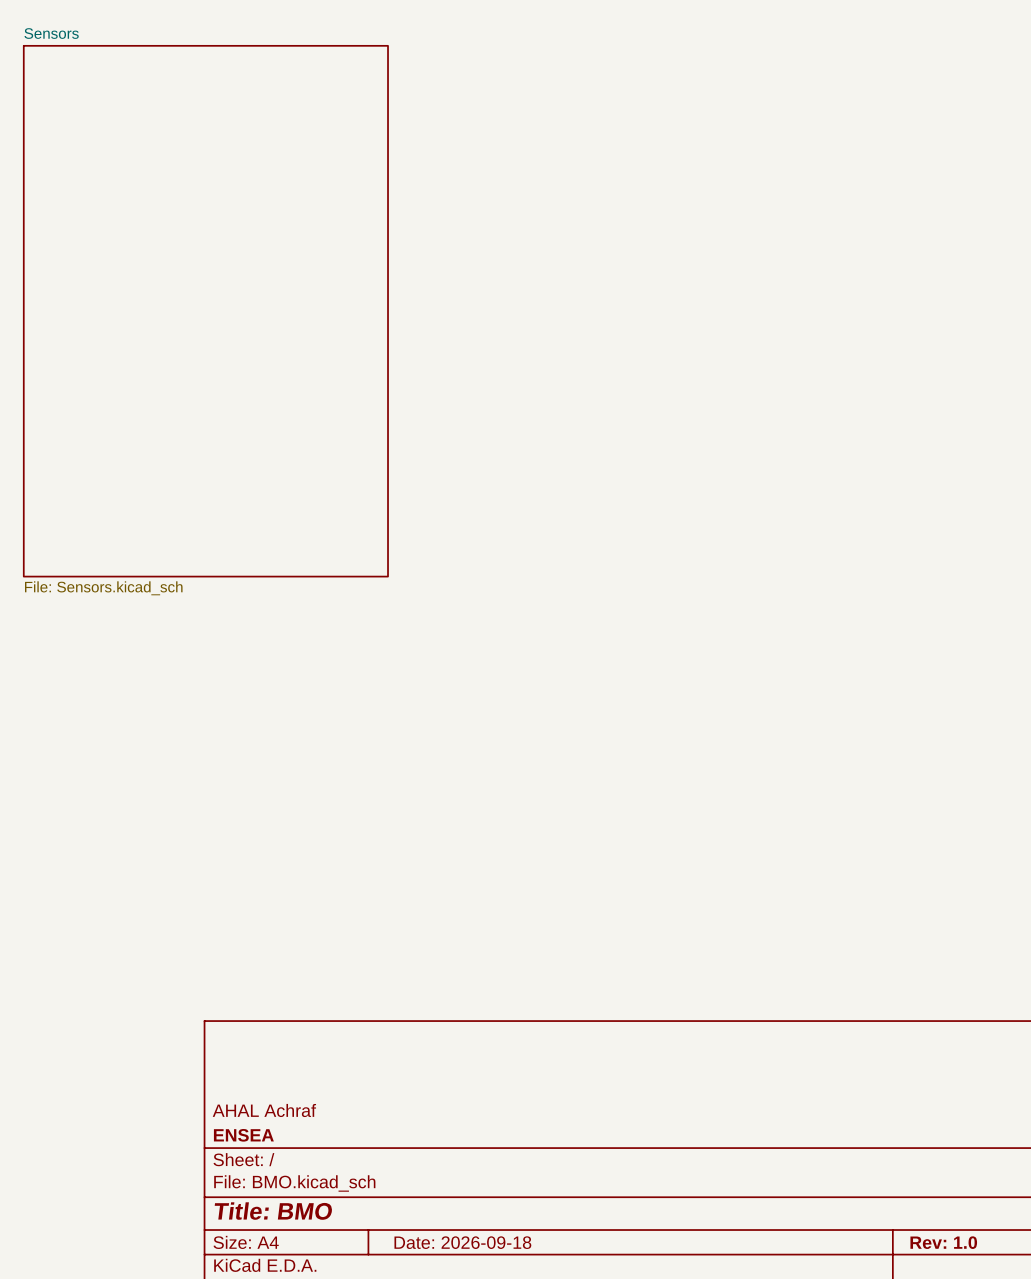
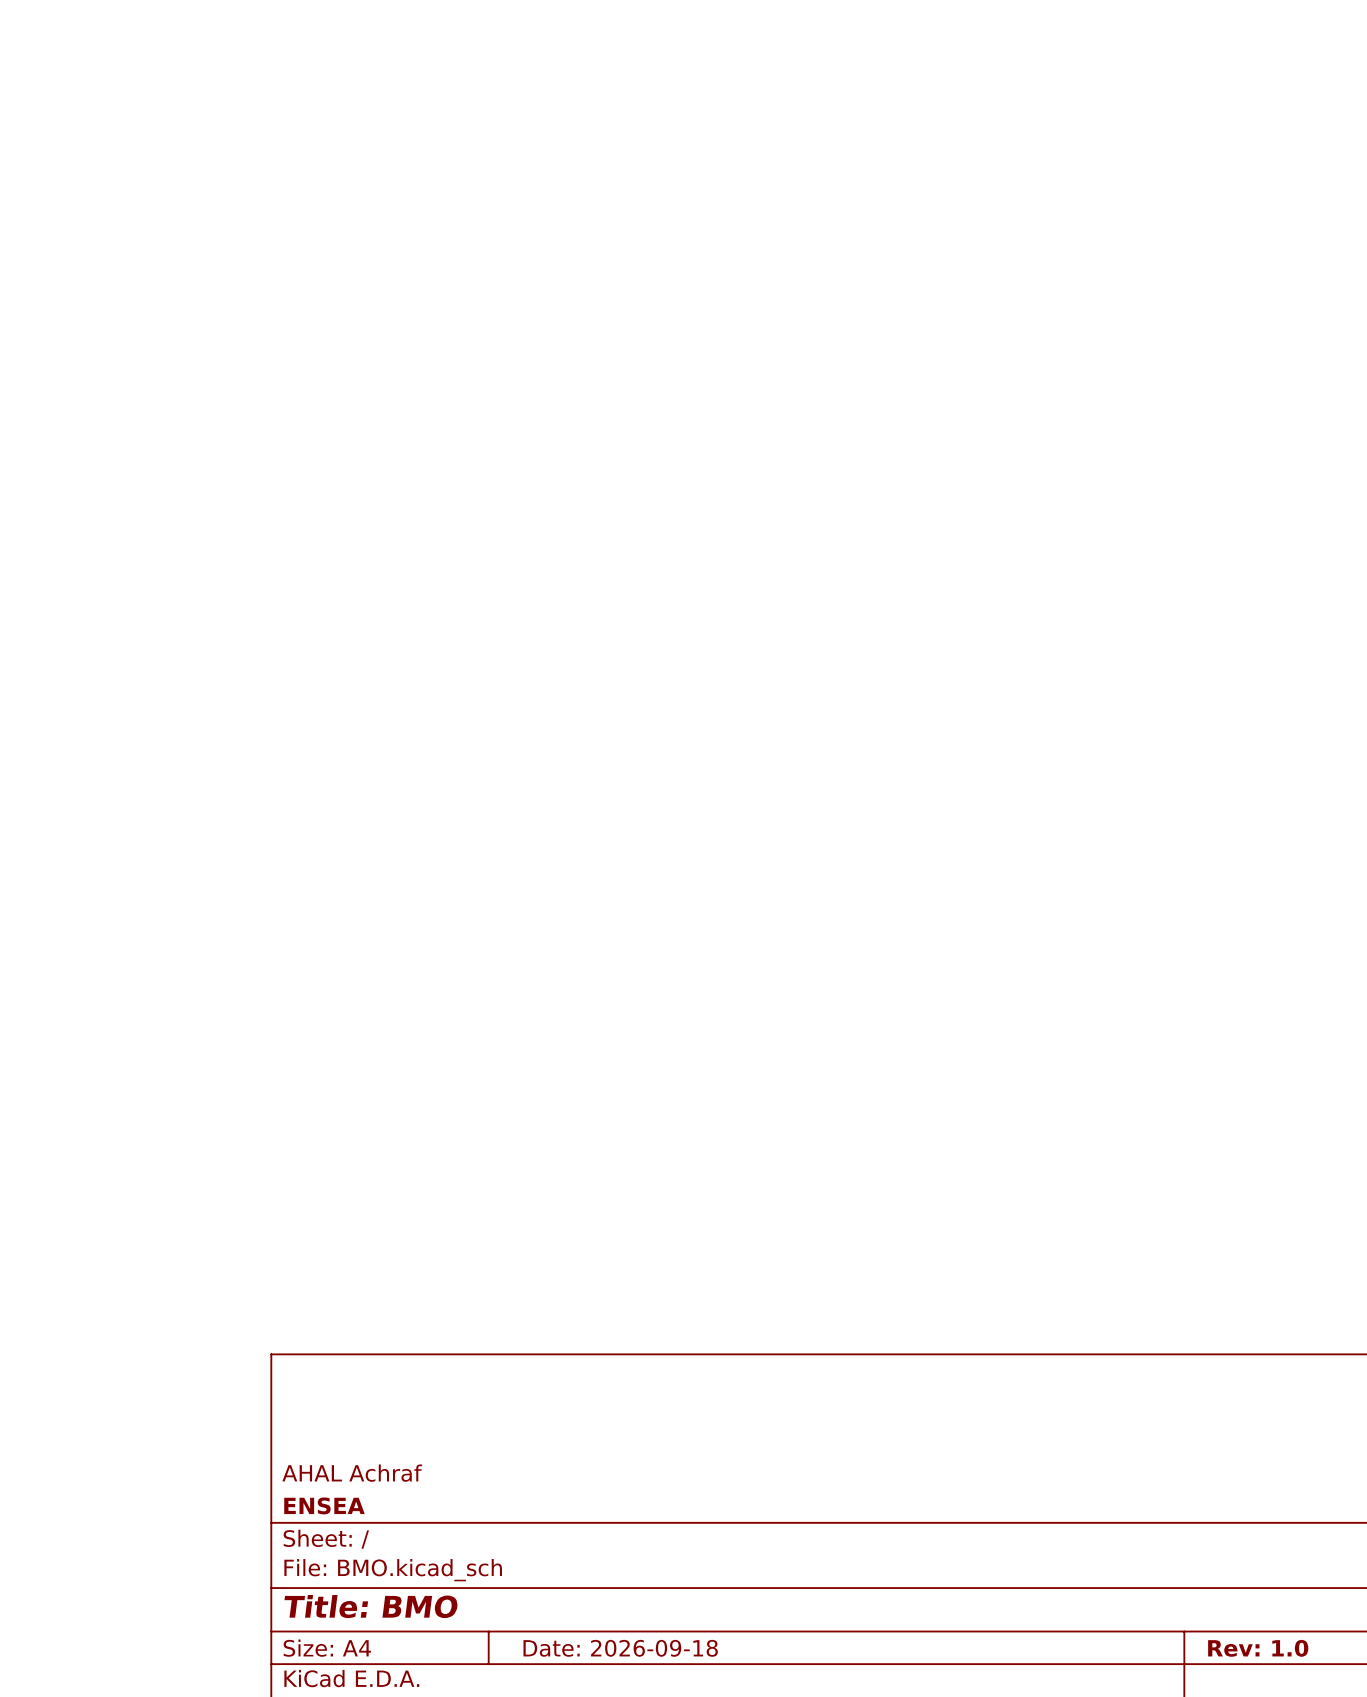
sheet Sensors: File: Sensors.kicad_sch (205, 311) -> none

